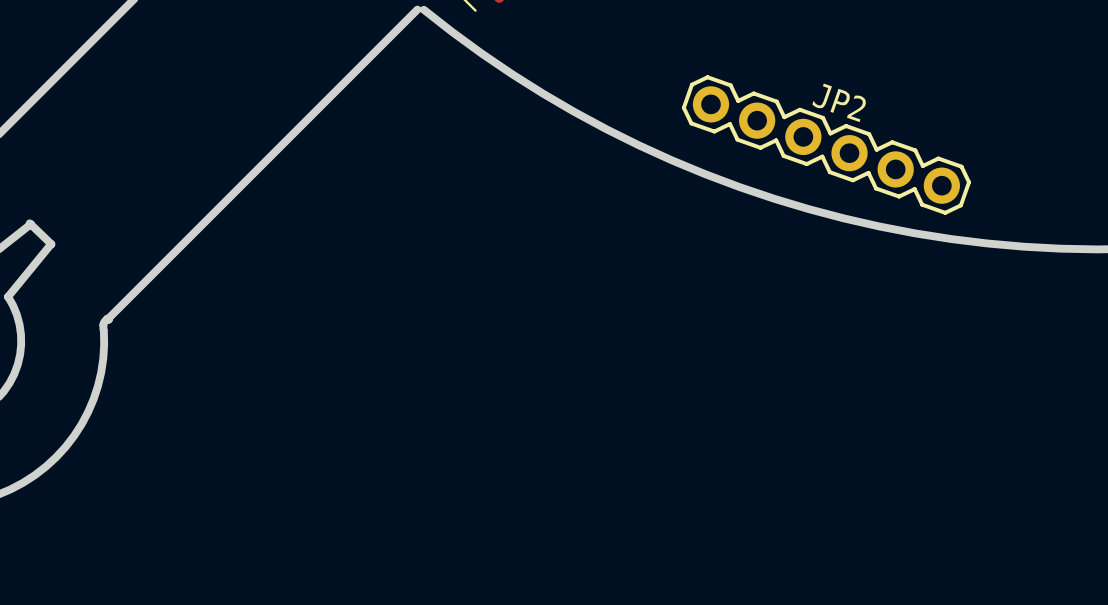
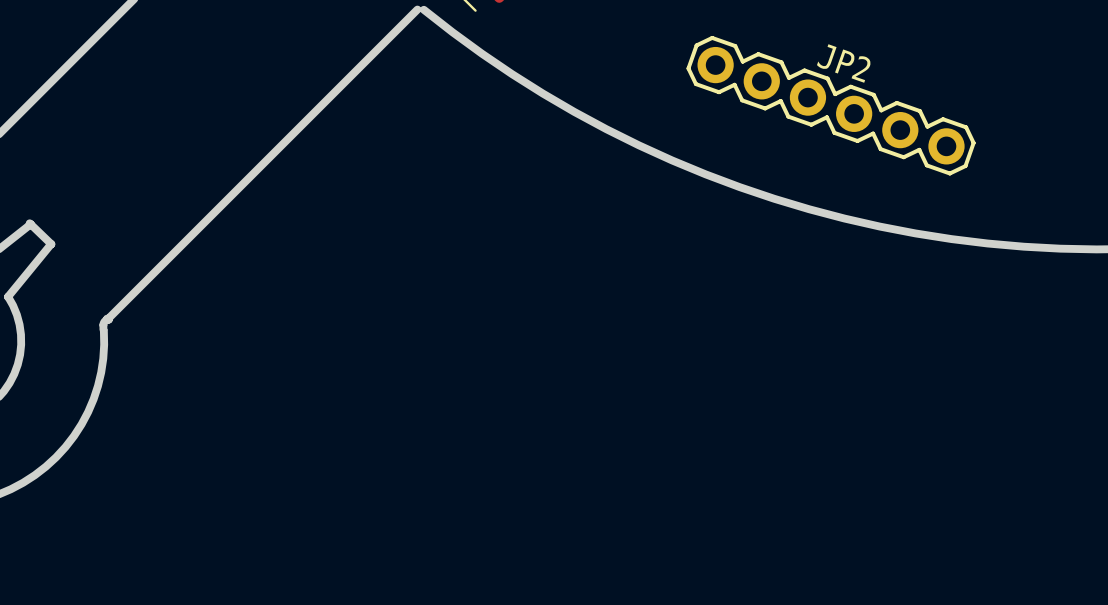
JP2 position: (826, 145) -> (831, 105)

